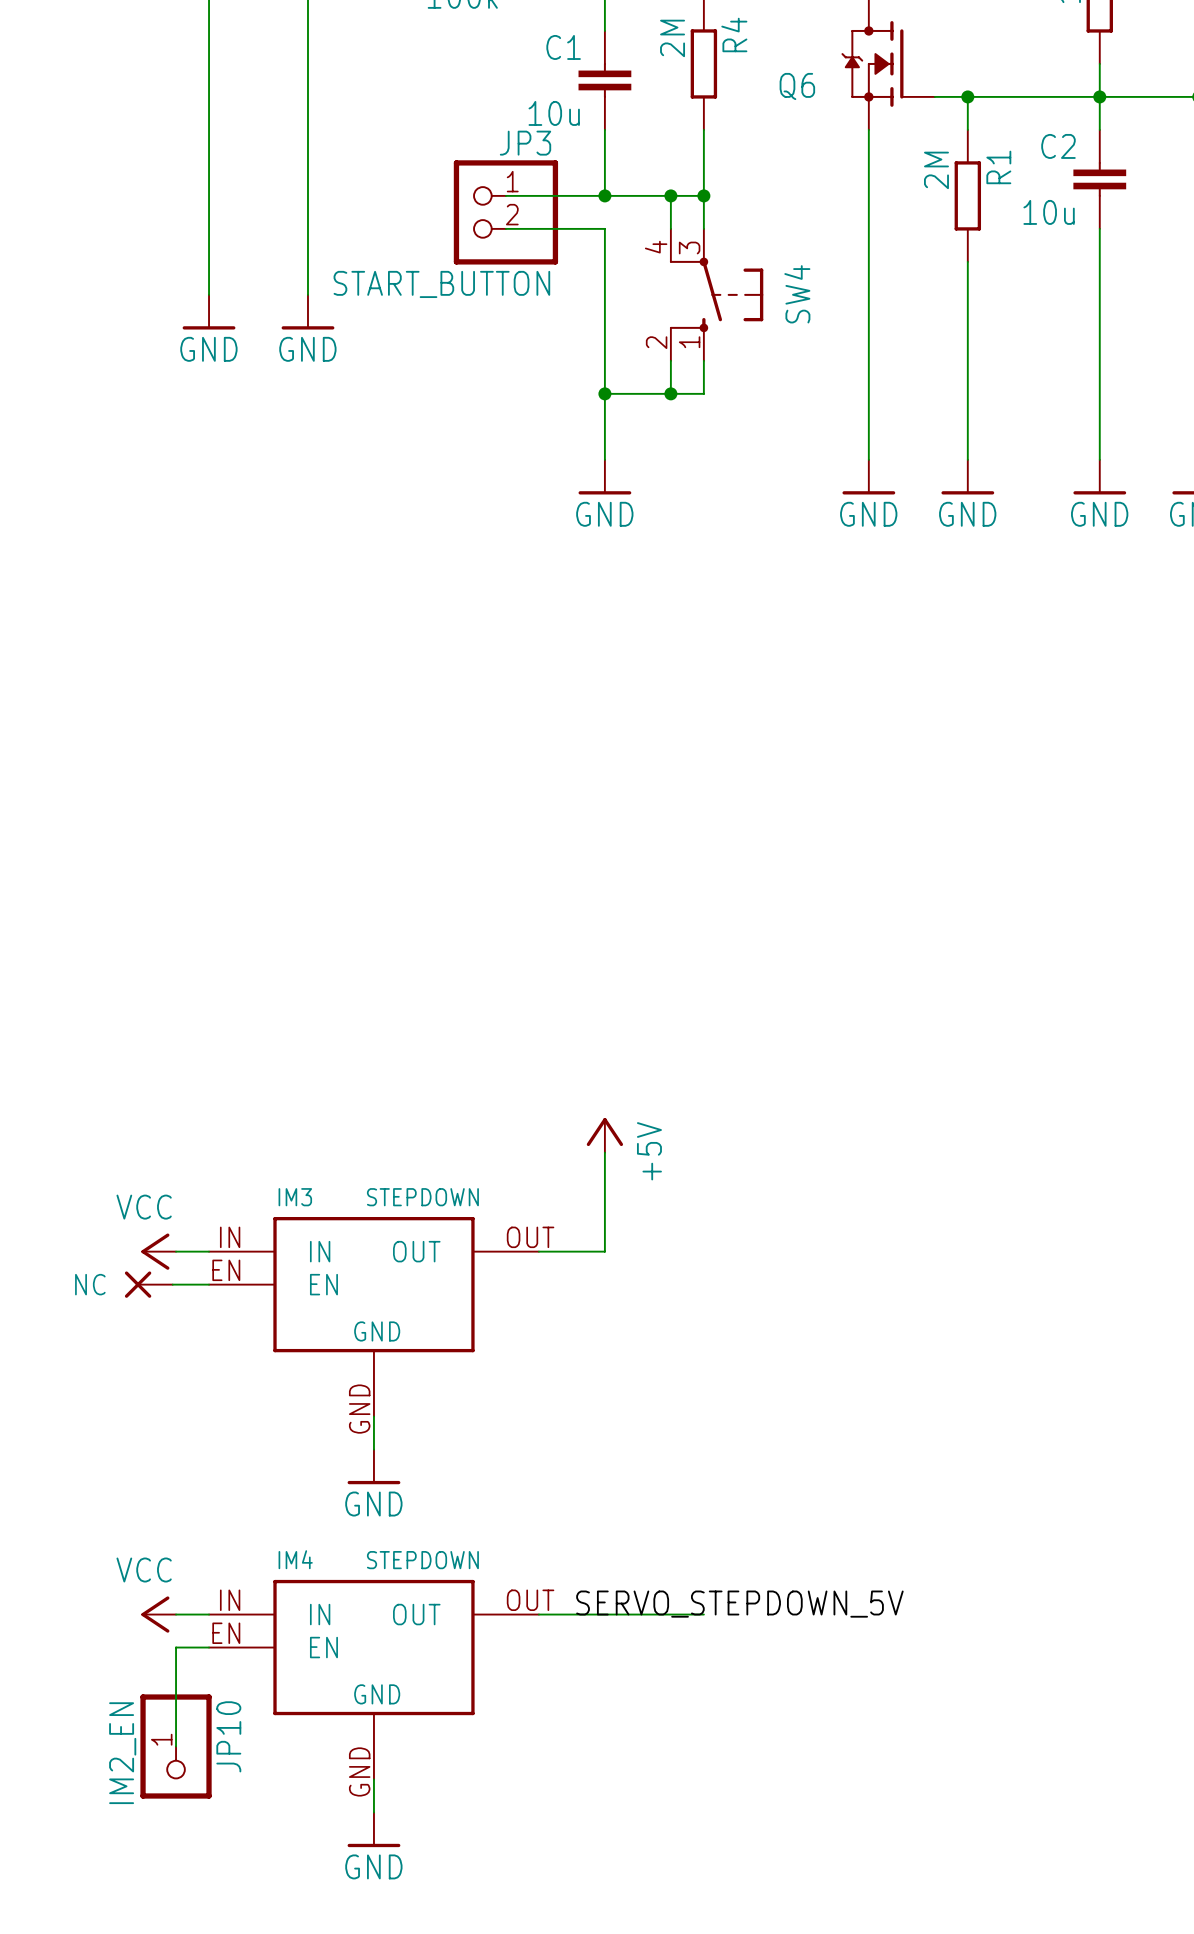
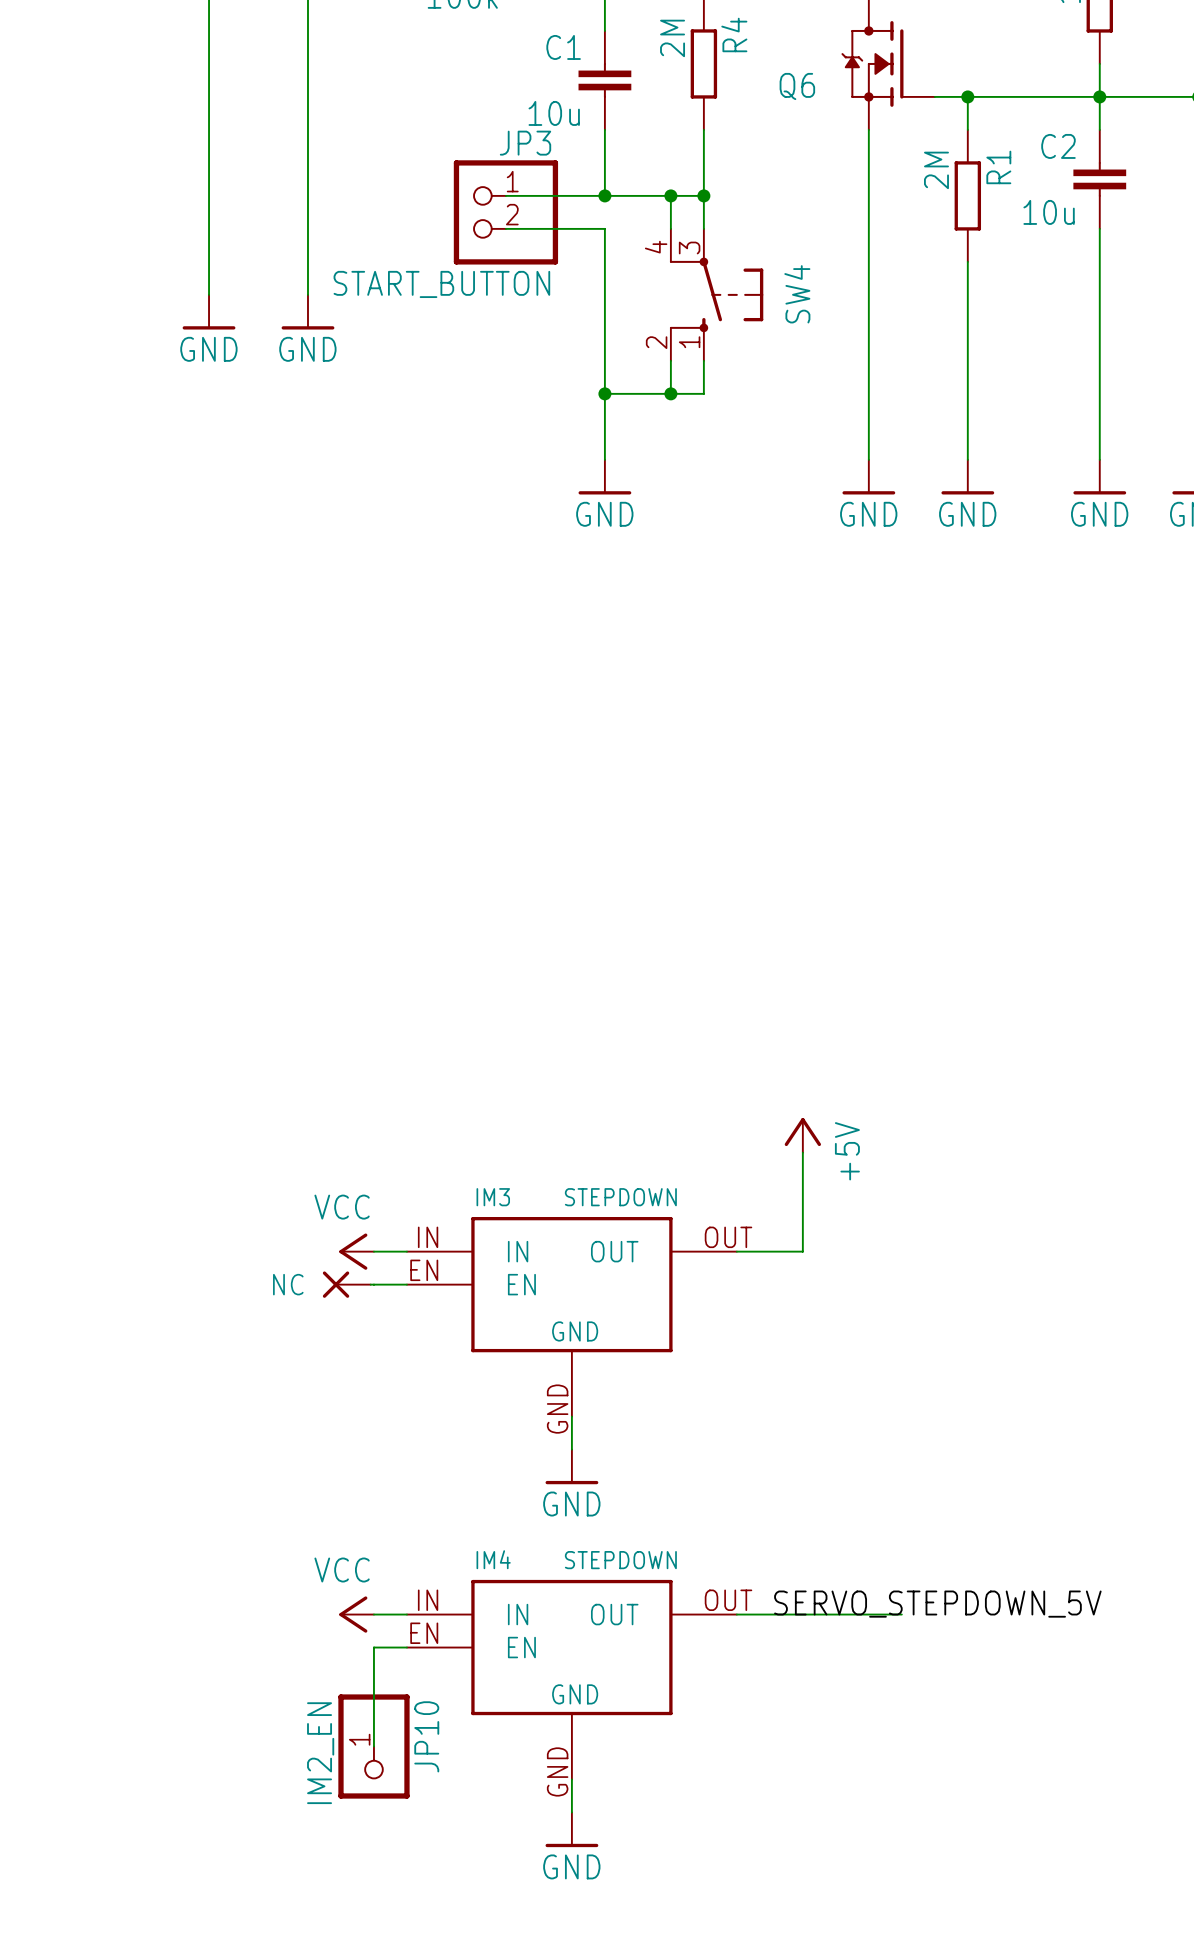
power symbol position: +5V (604, 1135) -> +5V (802, 1135)
wire: (604, 1152) (604, 1251) (538, 1251) -> (802, 1152) (802, 1251) (736, 1251)
power symbol position: VCC (158, 1251) -> VCC (356, 1251)
wire: (176, 1251) (209, 1251) -> (373, 1251) (406, 1251)
part position: (148, 1284) -> (346, 1284)
wire: (172, 1284) (209, 1284) -> (370, 1284) (406, 1284)
IM3 position: (373, 1316) -> (571, 1316)
wire: (373, 1416) (373, 1449) -> (571, 1416) (571, 1449)
power symbol position: GND (373, 1466) -> GND (571, 1466)
label position: SERVO_STEPDOWN_5V (739, 1604) -> SERVO_STEPDOWN_5V (937, 1604)
power symbol position: VCC (158, 1614) -> VCC (356, 1614)
wire: (176, 1614) (209, 1614) -> (373, 1614) (406, 1614)
wire: (538, 1614) (703, 1614) -> (736, 1614) (901, 1614)
wire: (209, 1647) (176, 1647) (176, 1746) -> (406, 1647) (373, 1647) (373, 1746)
IM4 position: (373, 1679) -> (571, 1679)
JP10 position: (176, 1746) -> (373, 1746)
wire: (373, 1779) (373, 1812) -> (571, 1779) (571, 1812)
power symbol position: GND (373, 1829) -> GND (571, 1829)

